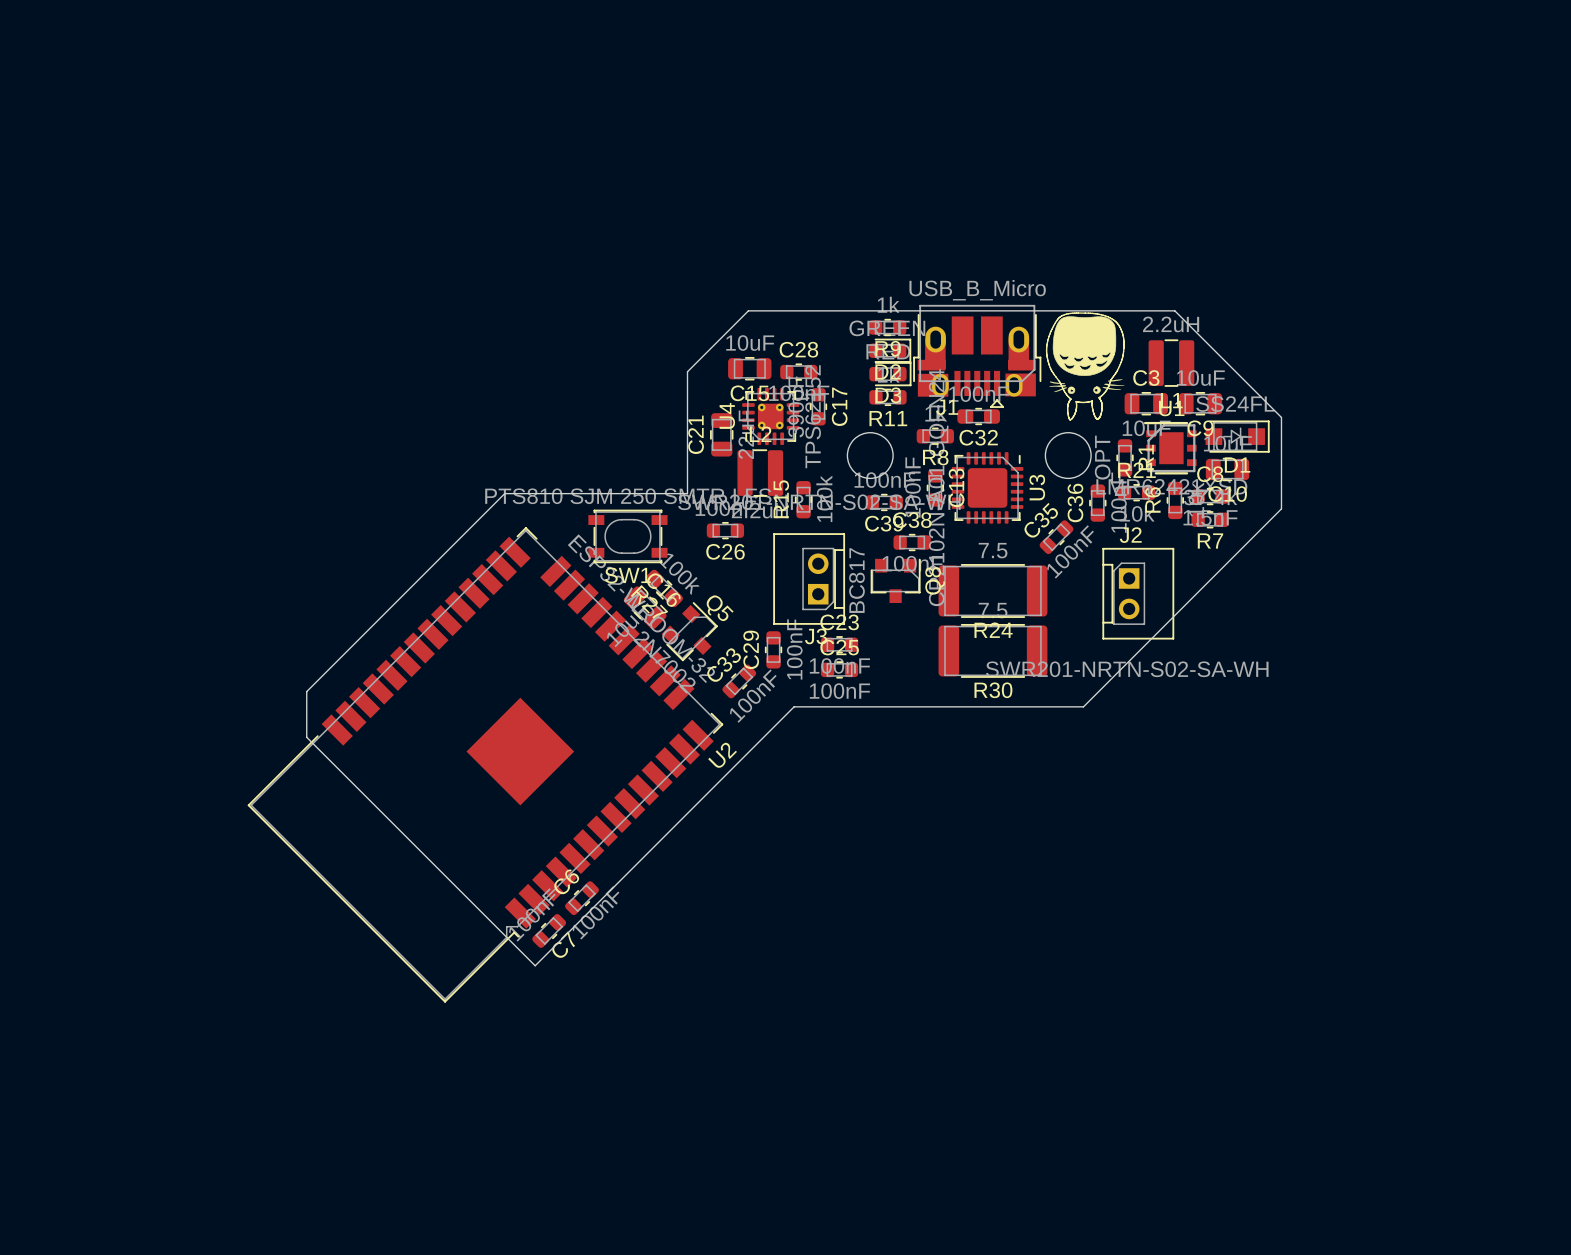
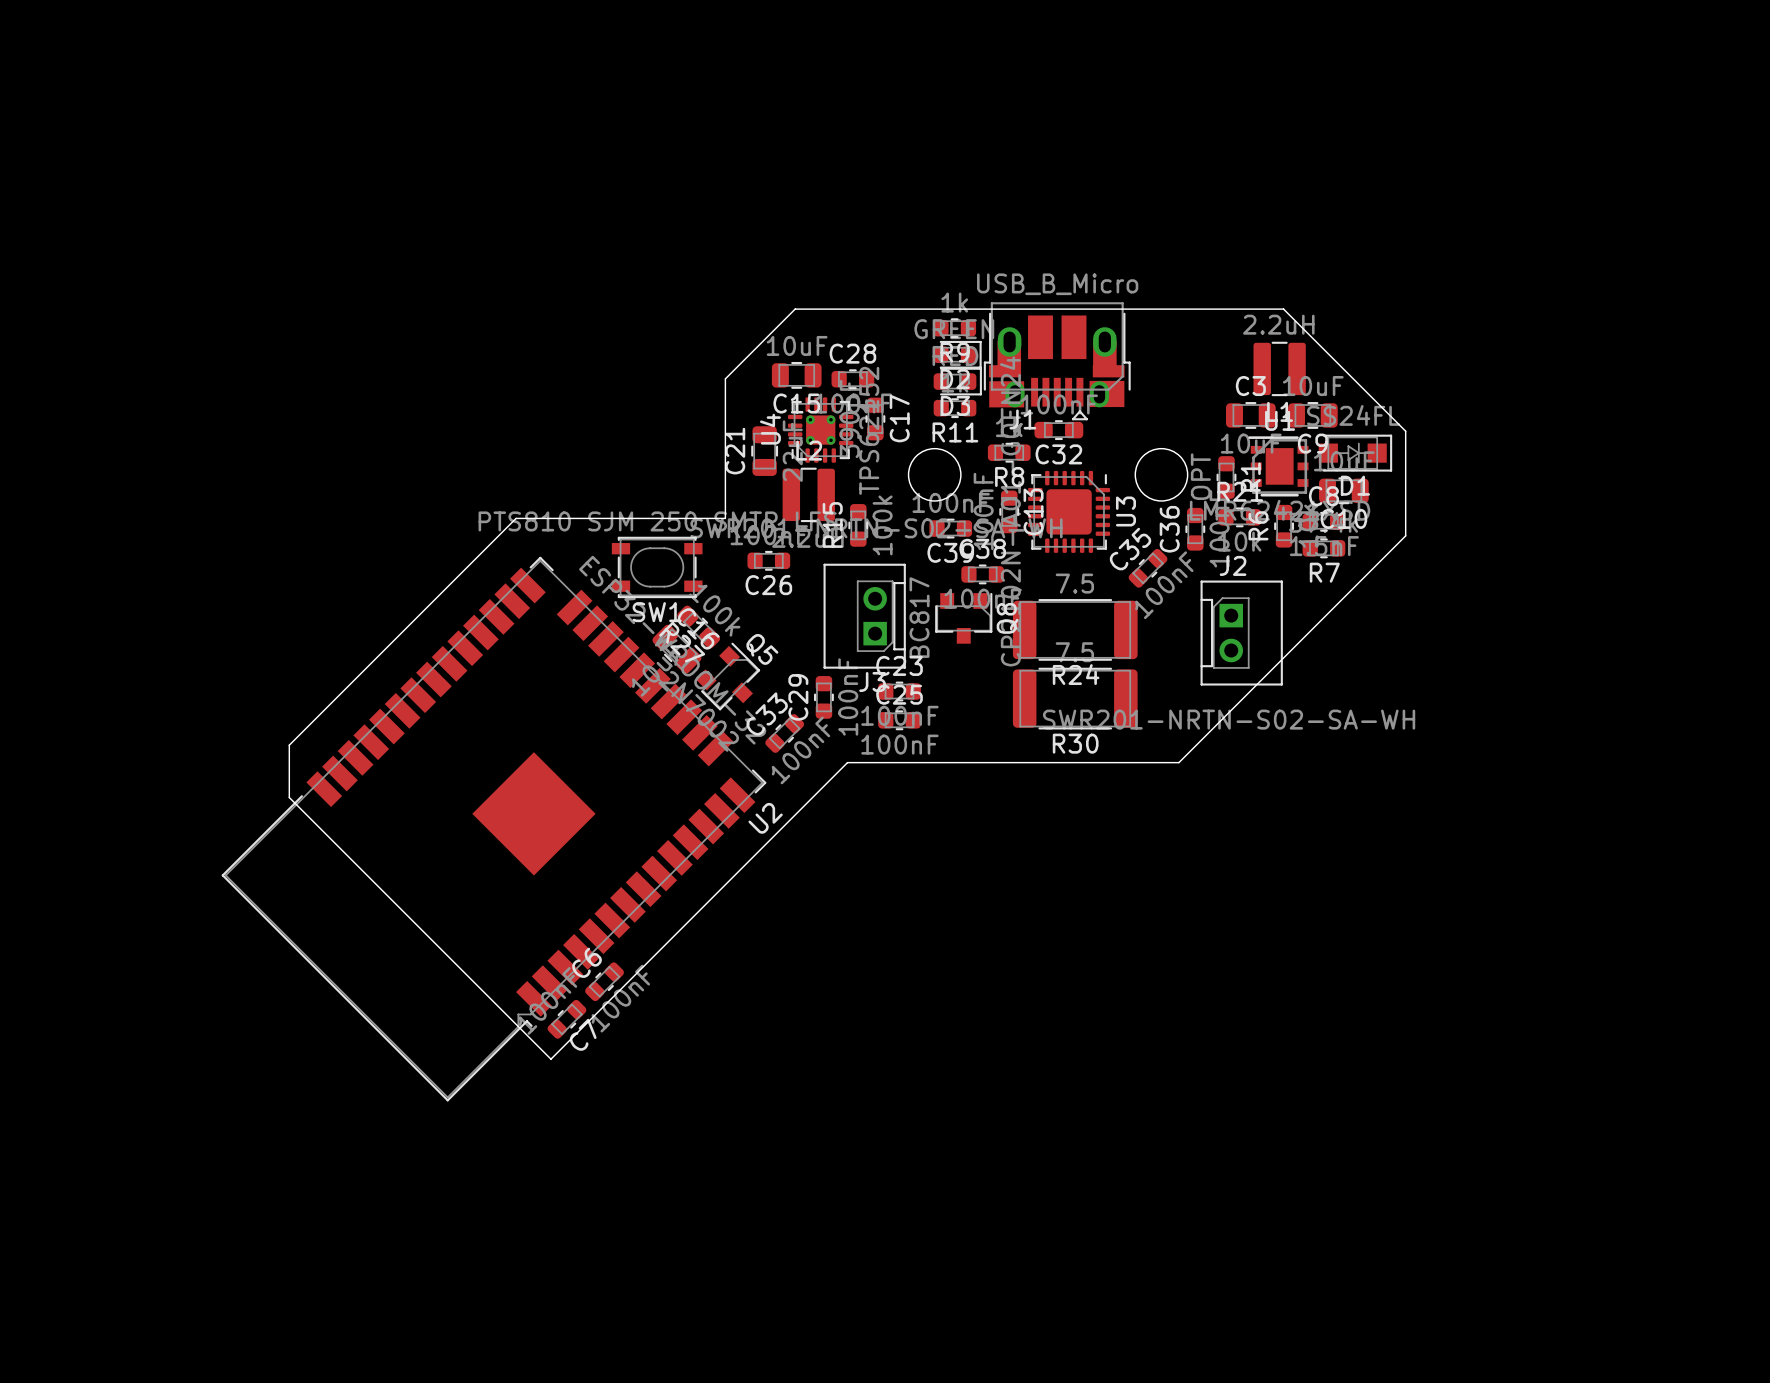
drawing: [1046, 312, 1125, 421] -> none

